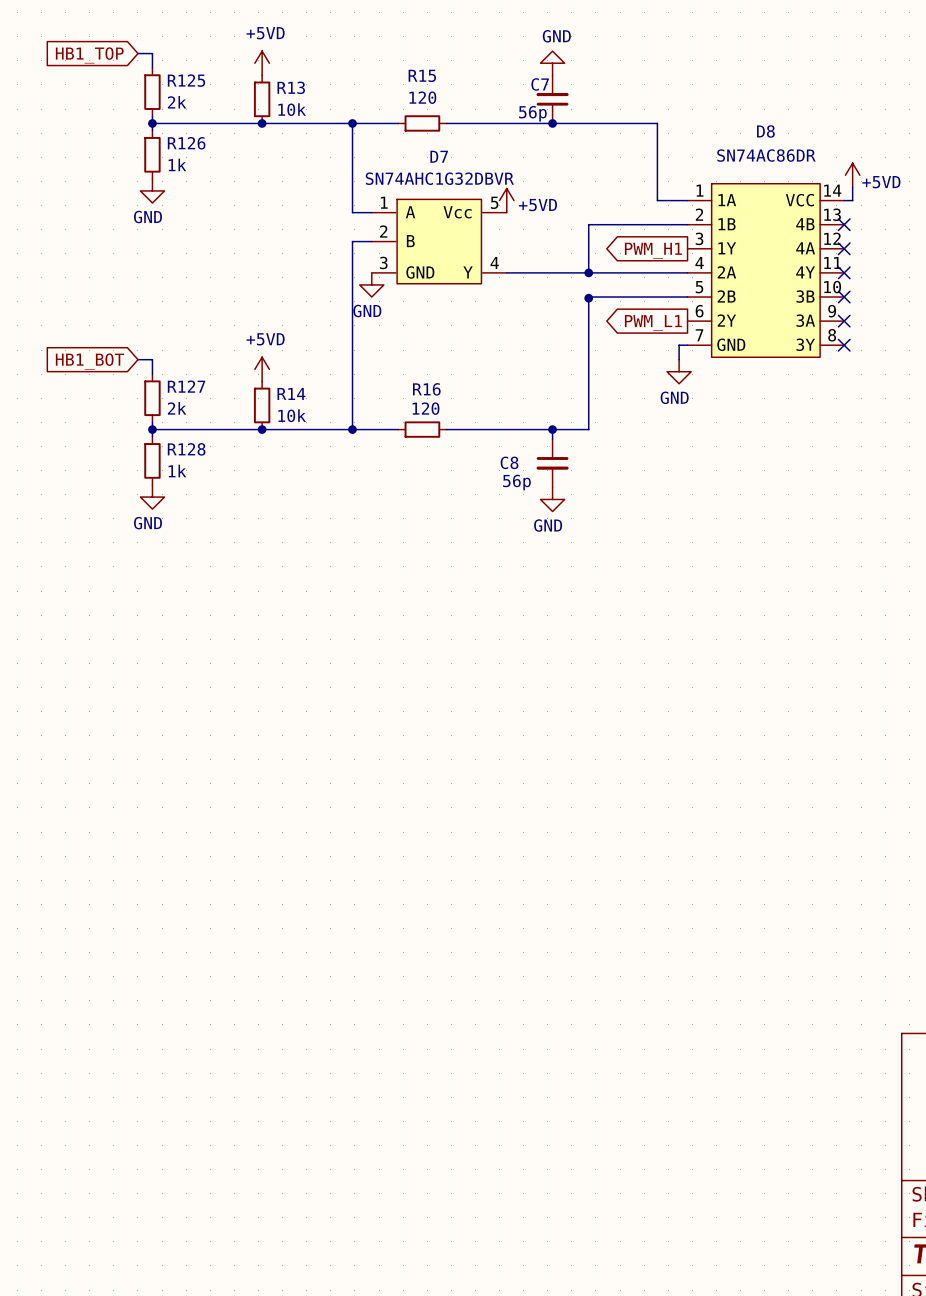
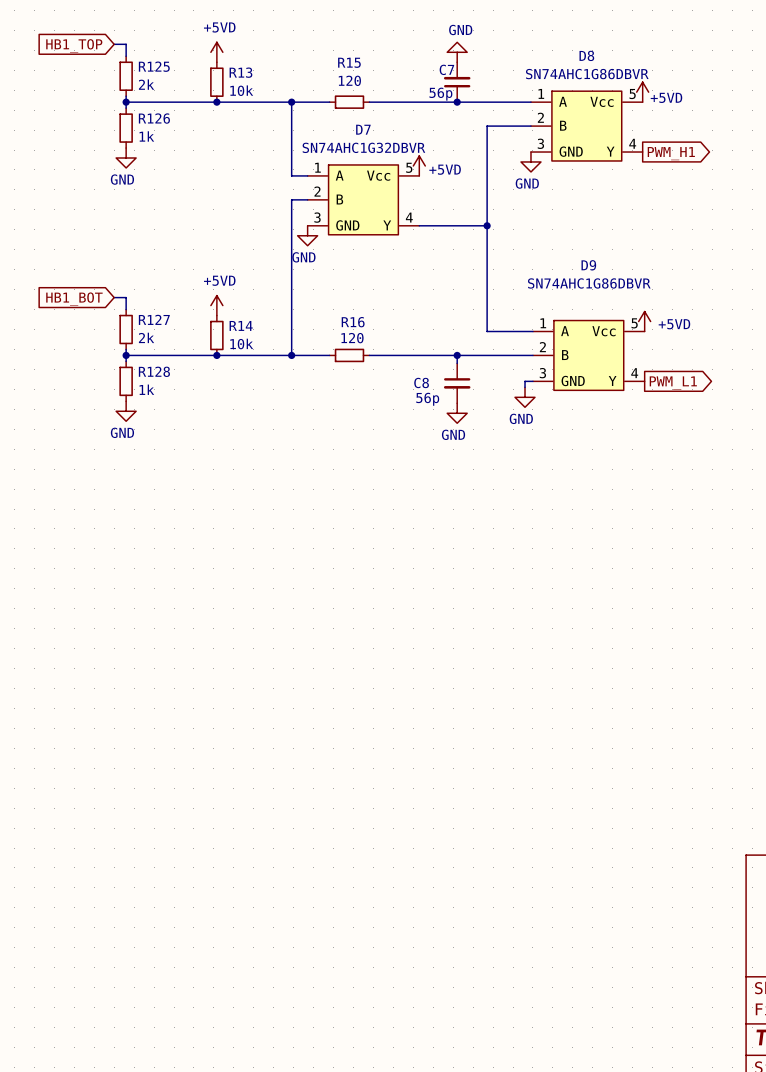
wire: (641, 123) (657, 123) (657, 200) (687, 200) -> none
D8 name position: D8 (765, 131) -> D8 (586, 55)
D8 value: SN74AC86DR (766, 155) -> SN74AHC1G86DBVR (587, 74)
power symbol position: +5VD (852, 175) -> +5VD (642, 92)
D8 symbol: [687, 183, 845, 358] -> [530, 91, 643, 161]
wire: (852, 187) (852, 200) (844, 200) -> none
power symbol: none -> GND (530, 161)
wire: (588, 224) (687, 224) -> (487, 185) (487, 126) (530, 126)
no-connect mark: (844, 224) -> none
no-connect mark: (844, 248) -> none
global label rotation: 0° (653, 250) -> 180° (671, 153)
global label position: PWM_H1 (653, 250) -> PWM_H1 (671, 153)
wire: (588, 272) (687, 272) -> (487, 225) (487, 245)
no-connect mark: (844, 272) -> none
wire: (588, 297) (687, 297) -> none
no-connect mark: (844, 297) -> none
junction: (588, 298) -> none
no-connect mark: (844, 321) -> none
global label rotation: 0° (653, 323) -> 180° (673, 382)
global label position: PWM_L1 (653, 323) -> PWM_L1 (673, 382)
wire: (687, 345) (679, 345) (679, 359) -> none
no-connect mark: (844, 345) -> none
power symbol: GND (679, 371) -> none
power symbol: none -> +5VD (644, 321)
wire: (588, 400) (588, 429) -> (487, 331) (532, 331)
wire: none -> (487, 355) (532, 355)
D9: none -> SN74AHC1G86DBVR (588, 355)
wire: none -> (532, 381) (525, 381) (525, 387)
power symbol: none -> GND (525, 397)

